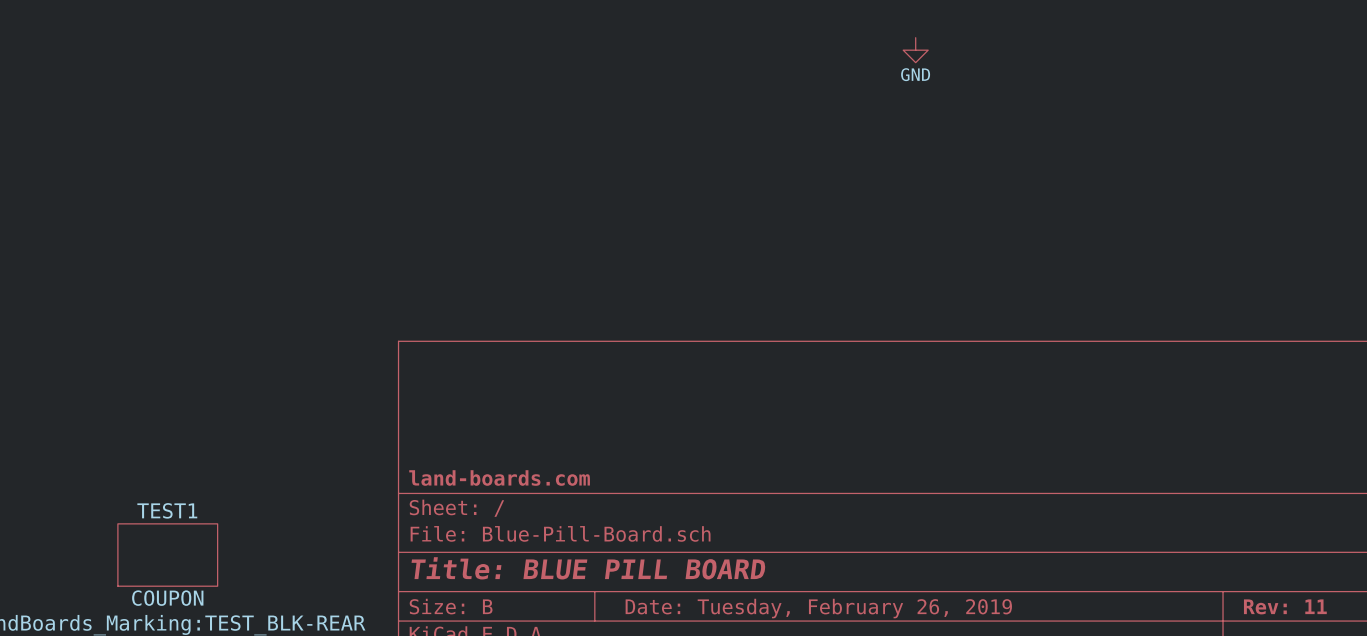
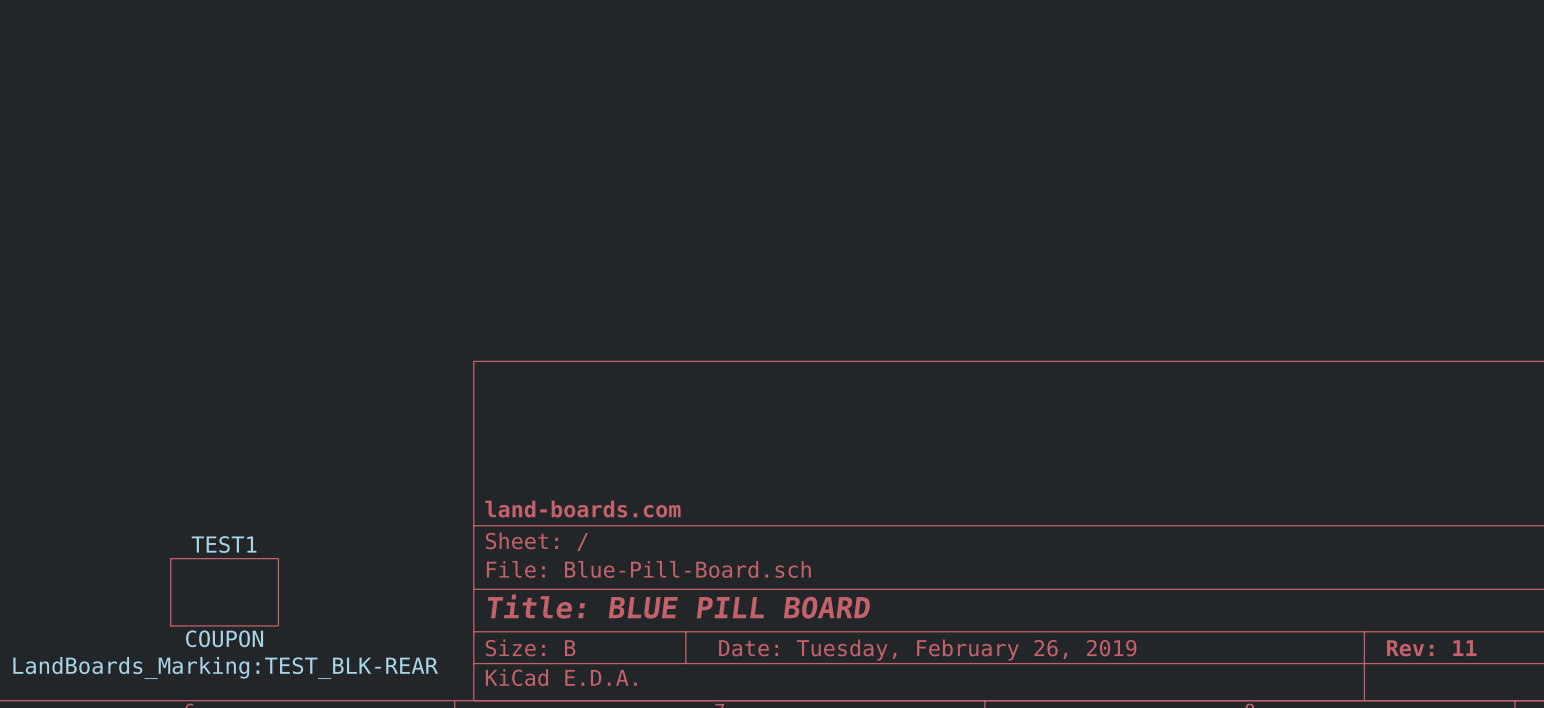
power symbol: GND (915, 50) -> none

